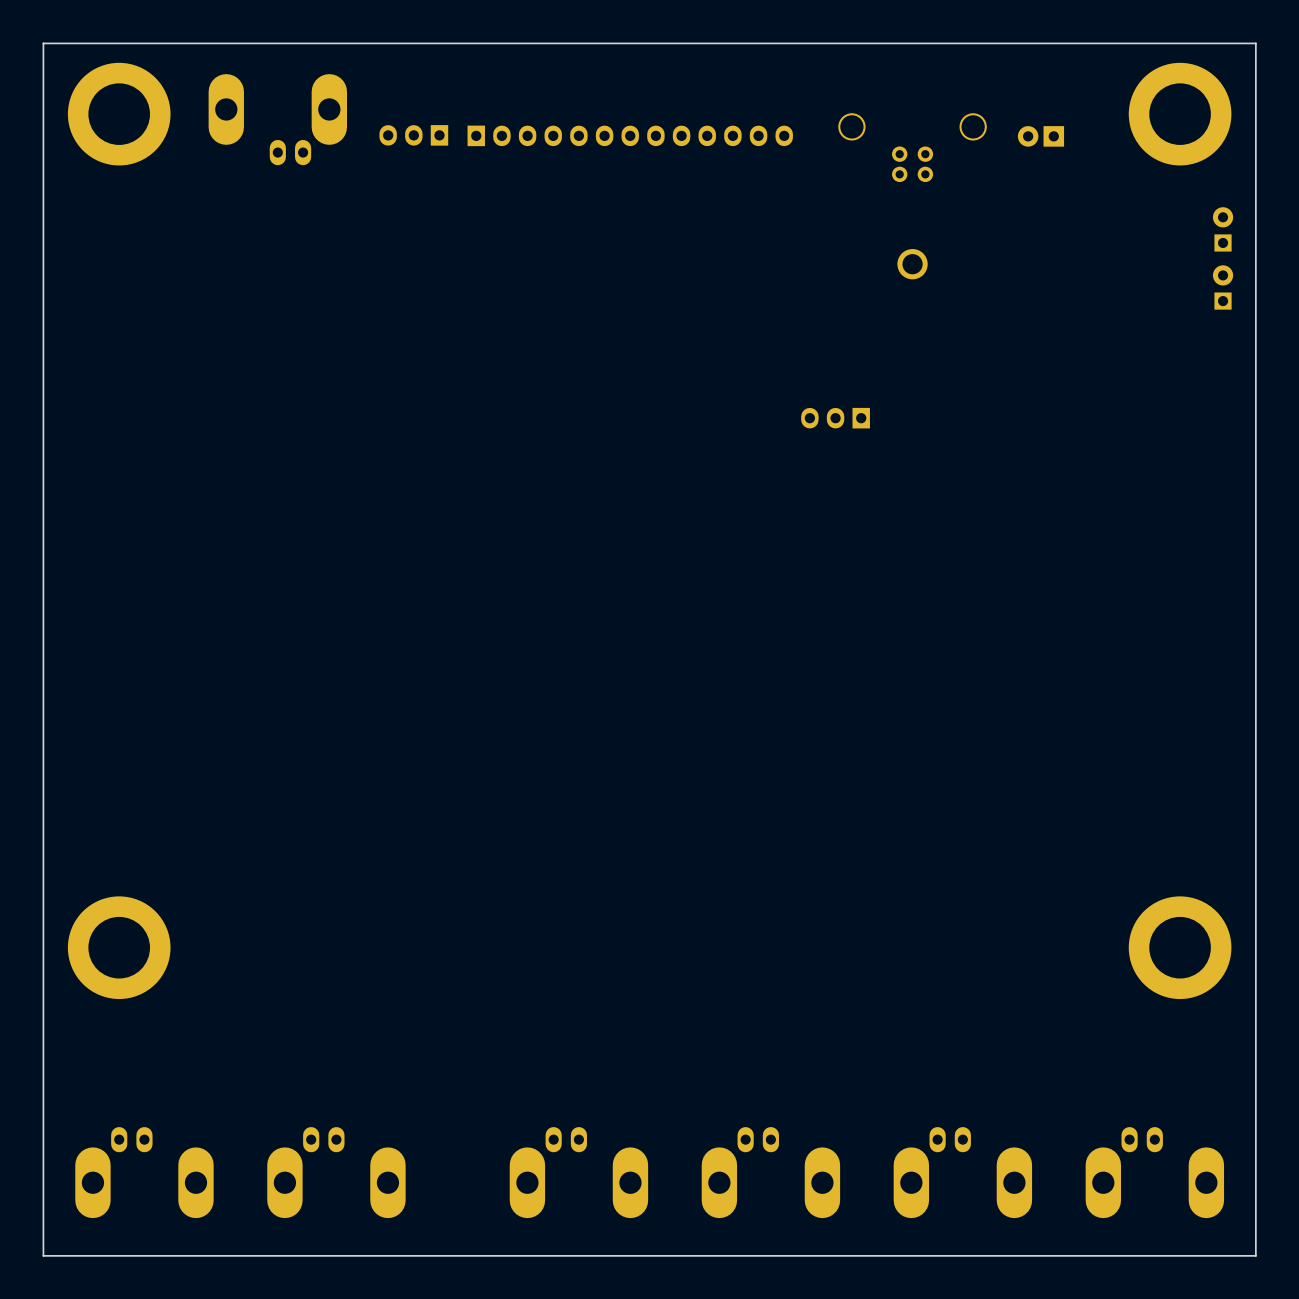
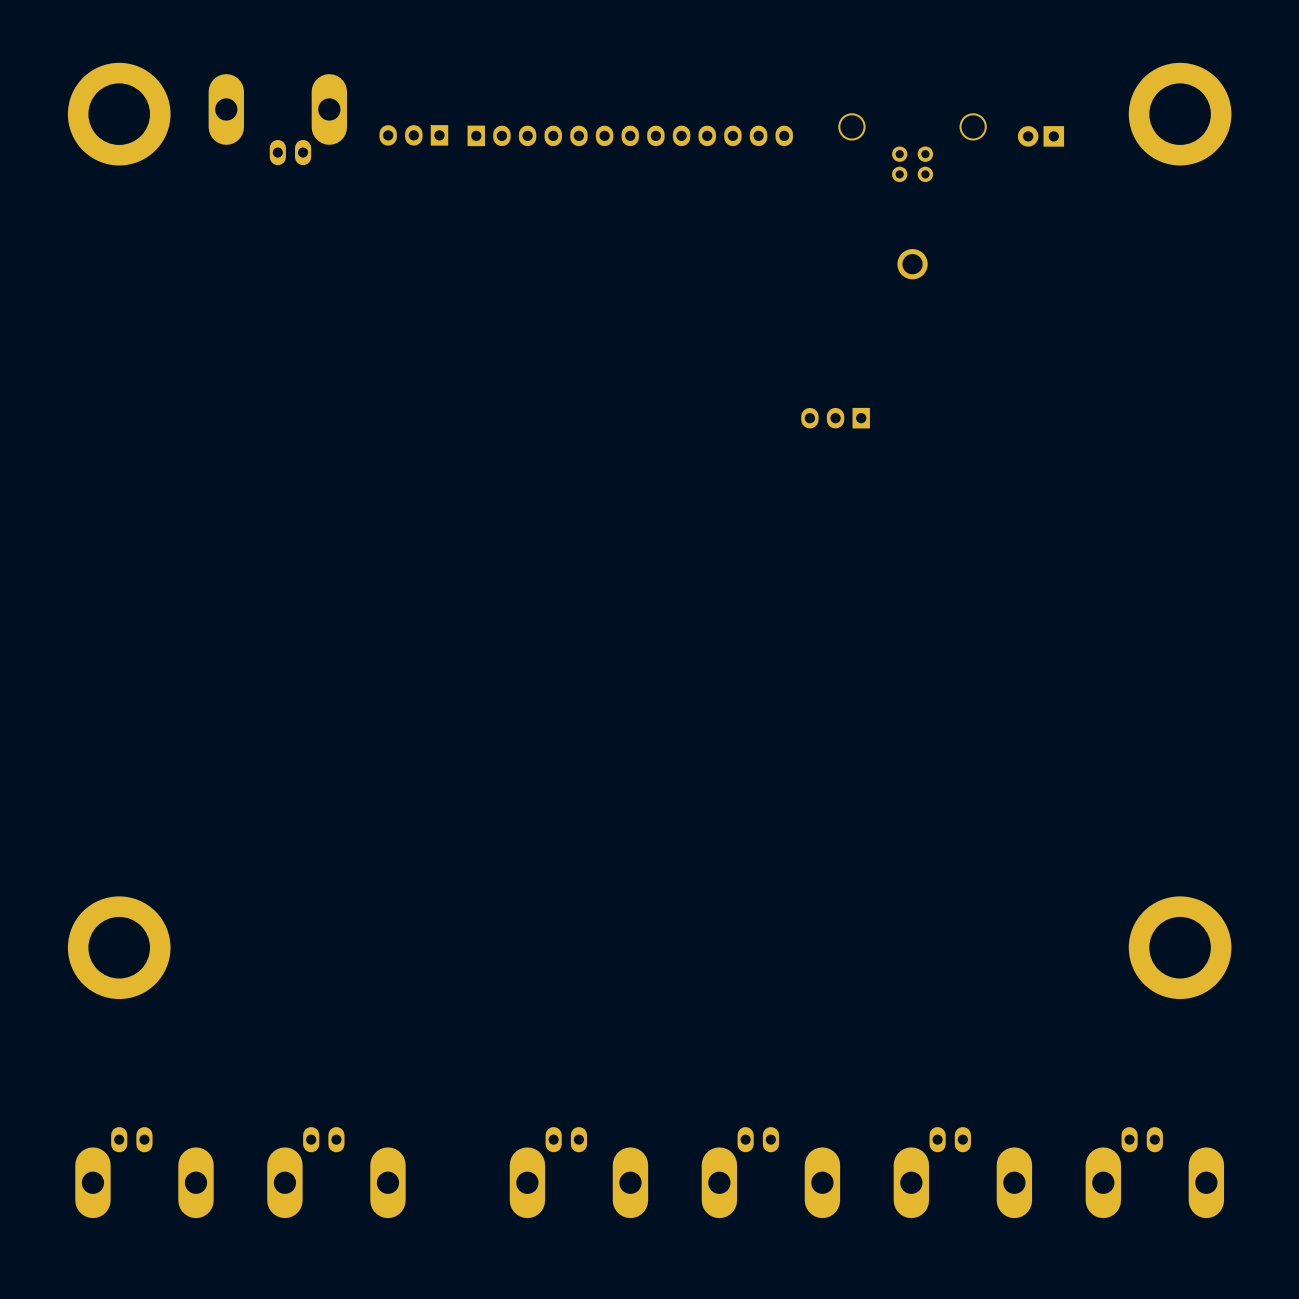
board edge: (1255, 43) (43, 43) (43, 1255) (1255, 1255) (1255, 43) -> none
part: (1223, 229) -> none
part: (1223, 287) -> none

